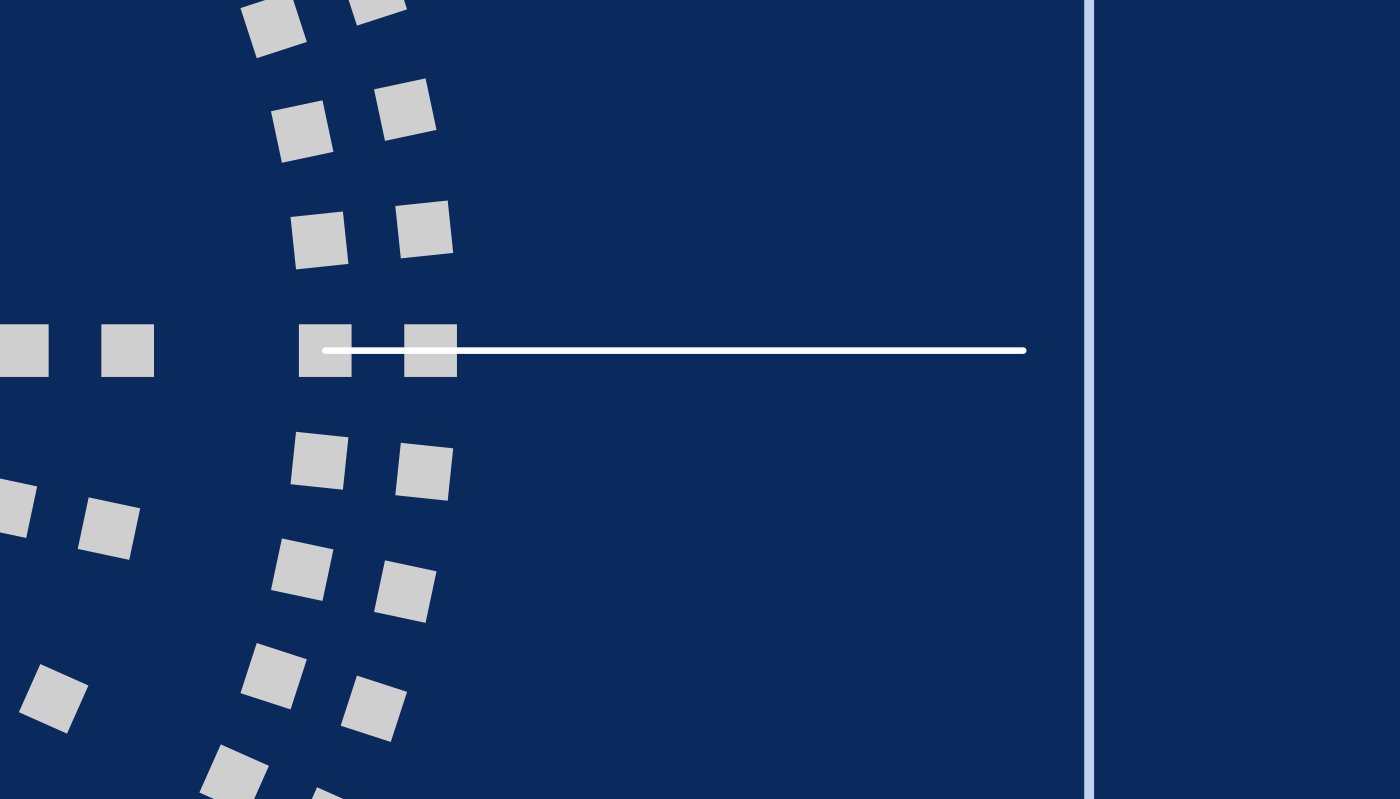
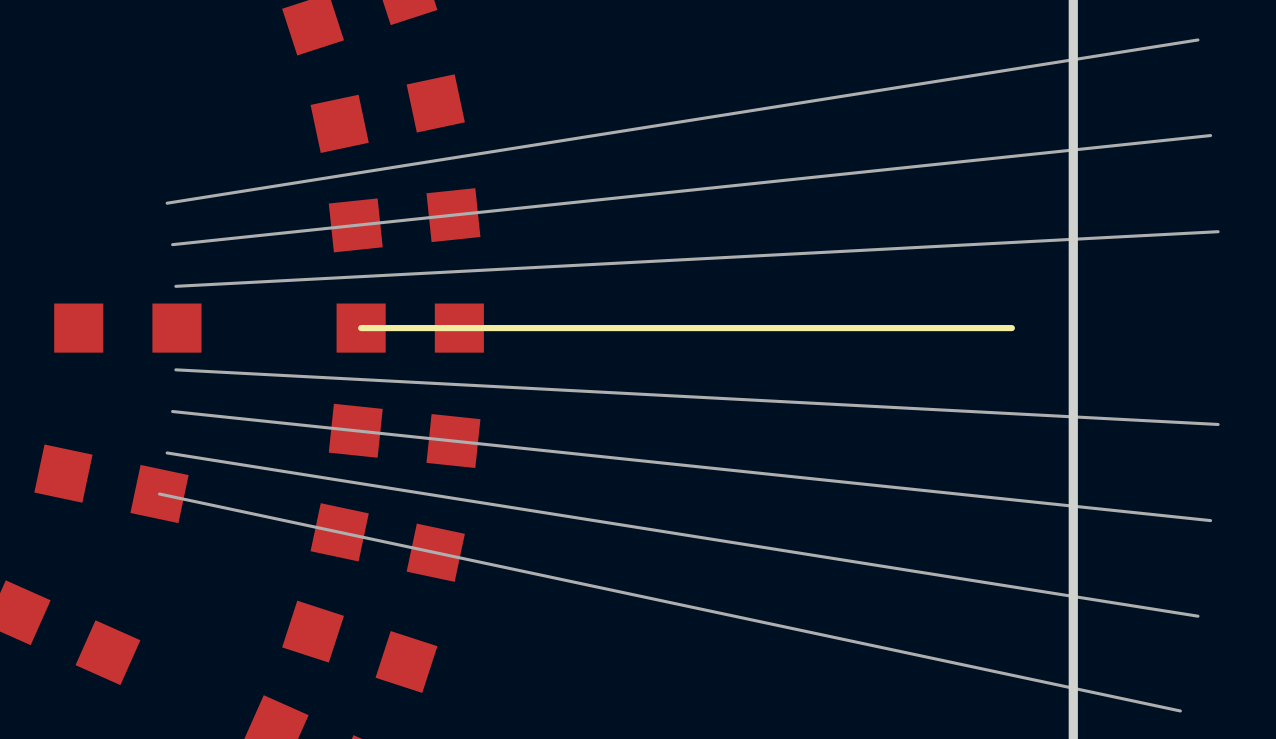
line: none -> (1197, 39) (167, 203)
line: none -> (1210, 135) (172, 244)
line: none -> (1218, 231) (175, 286)
line: none -> (175, 369) (1218, 424)
line: none -> (172, 411) (1210, 520)
line: none -> (167, 452) (1197, 616)
line: none -> (159, 494) (1180, 710)

